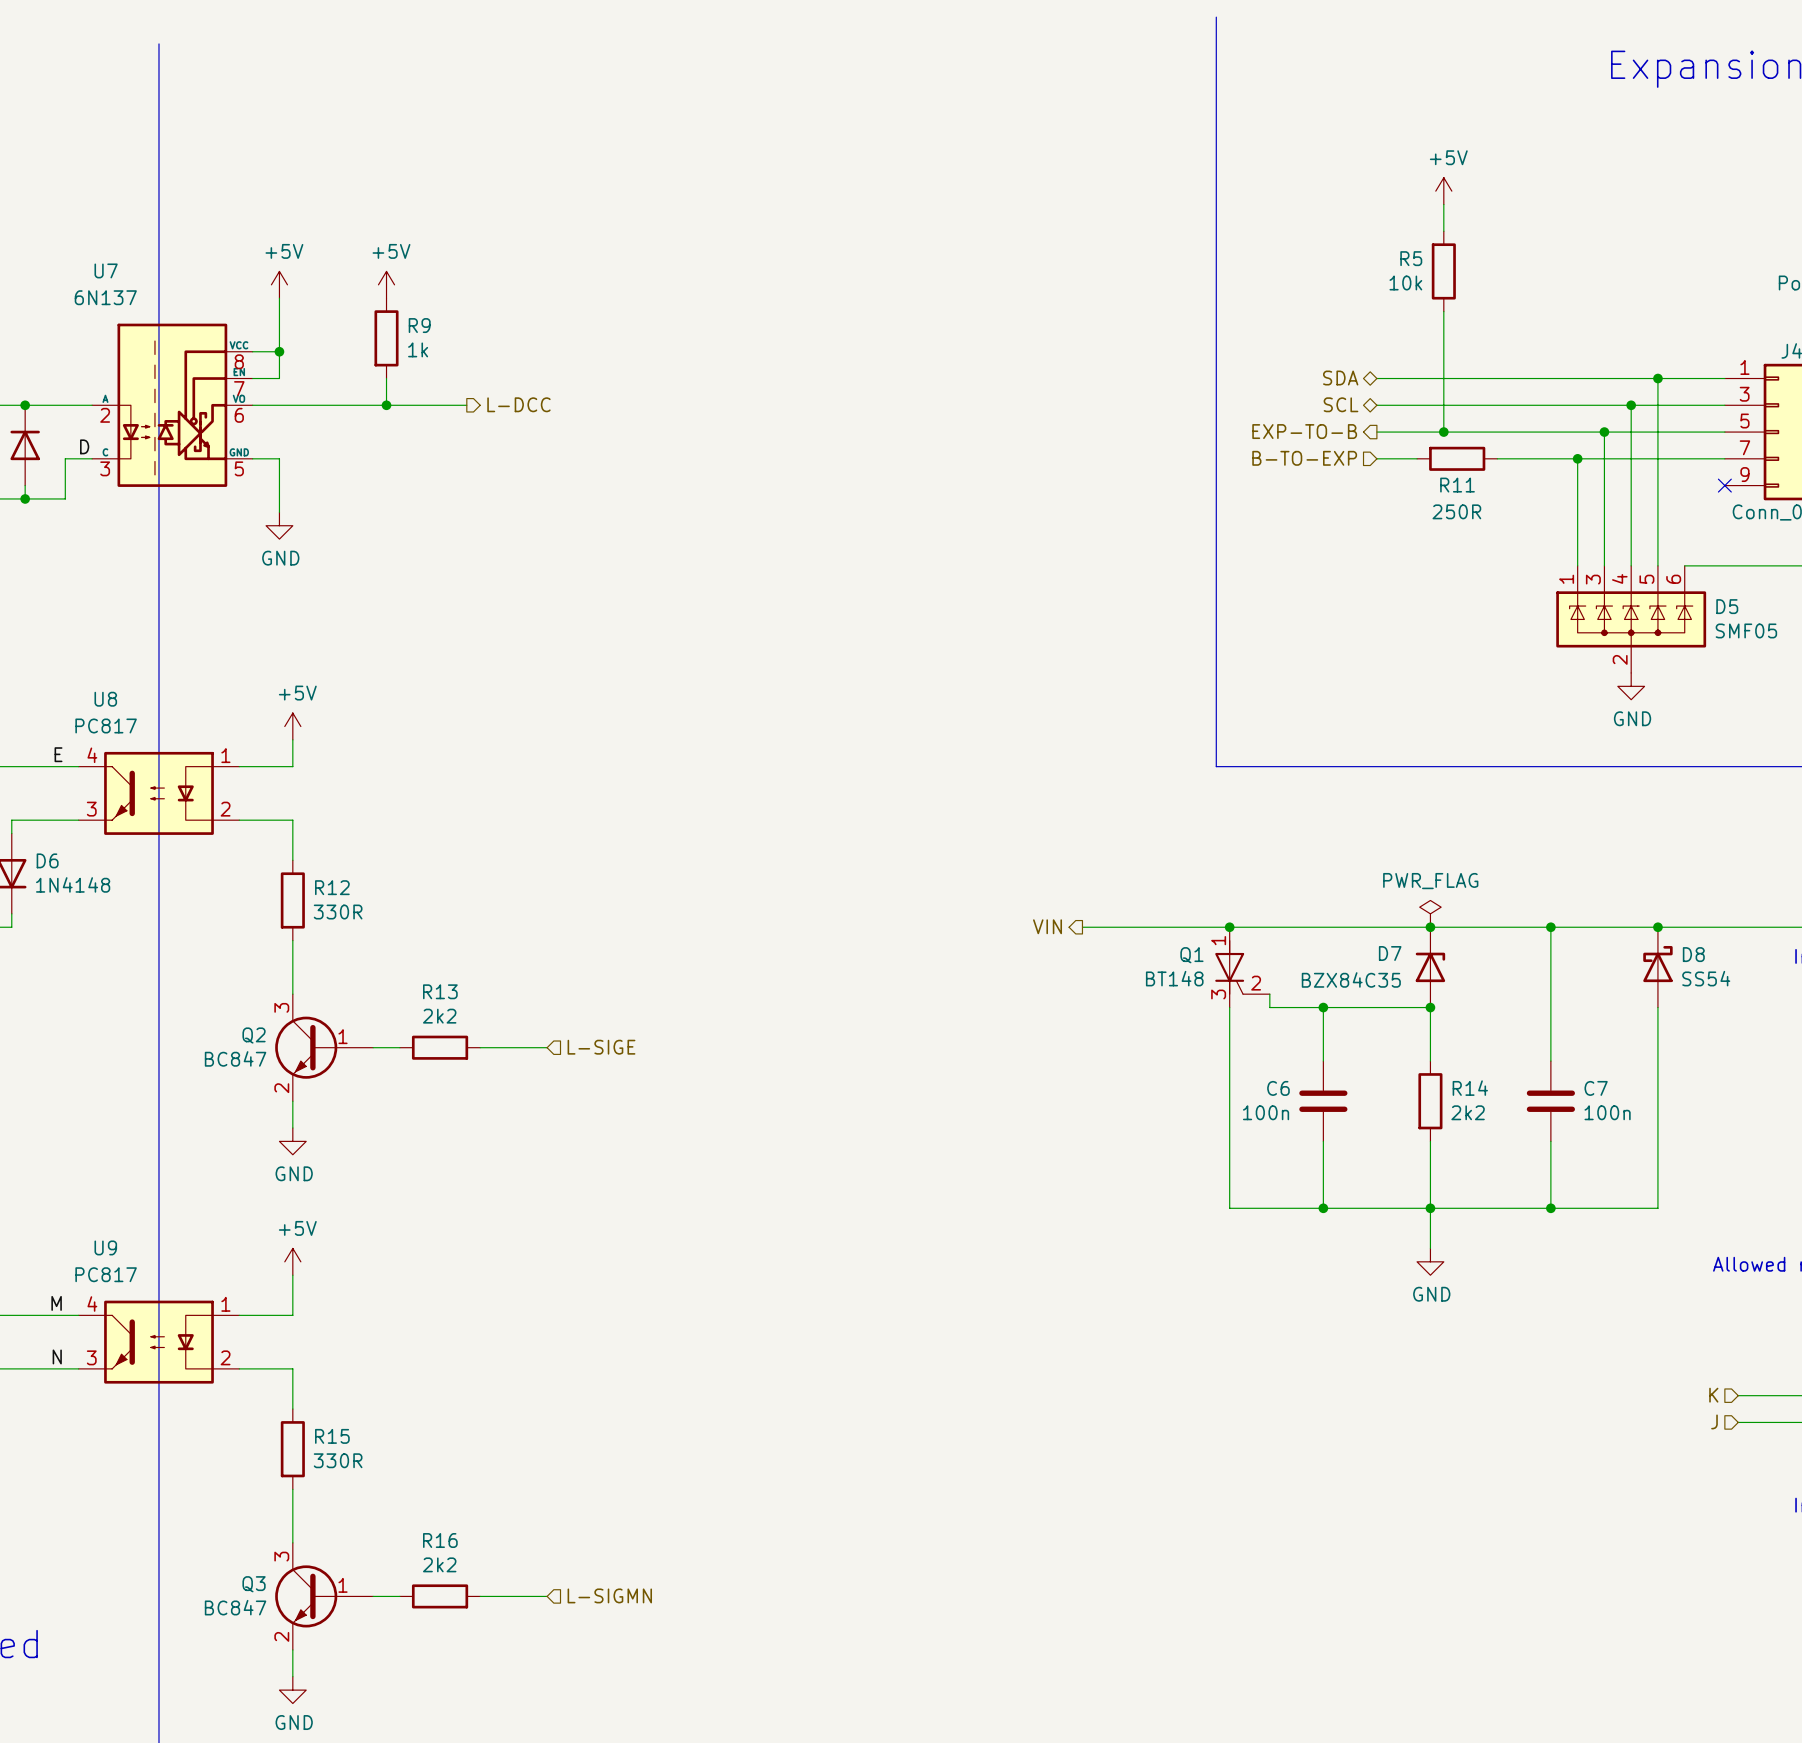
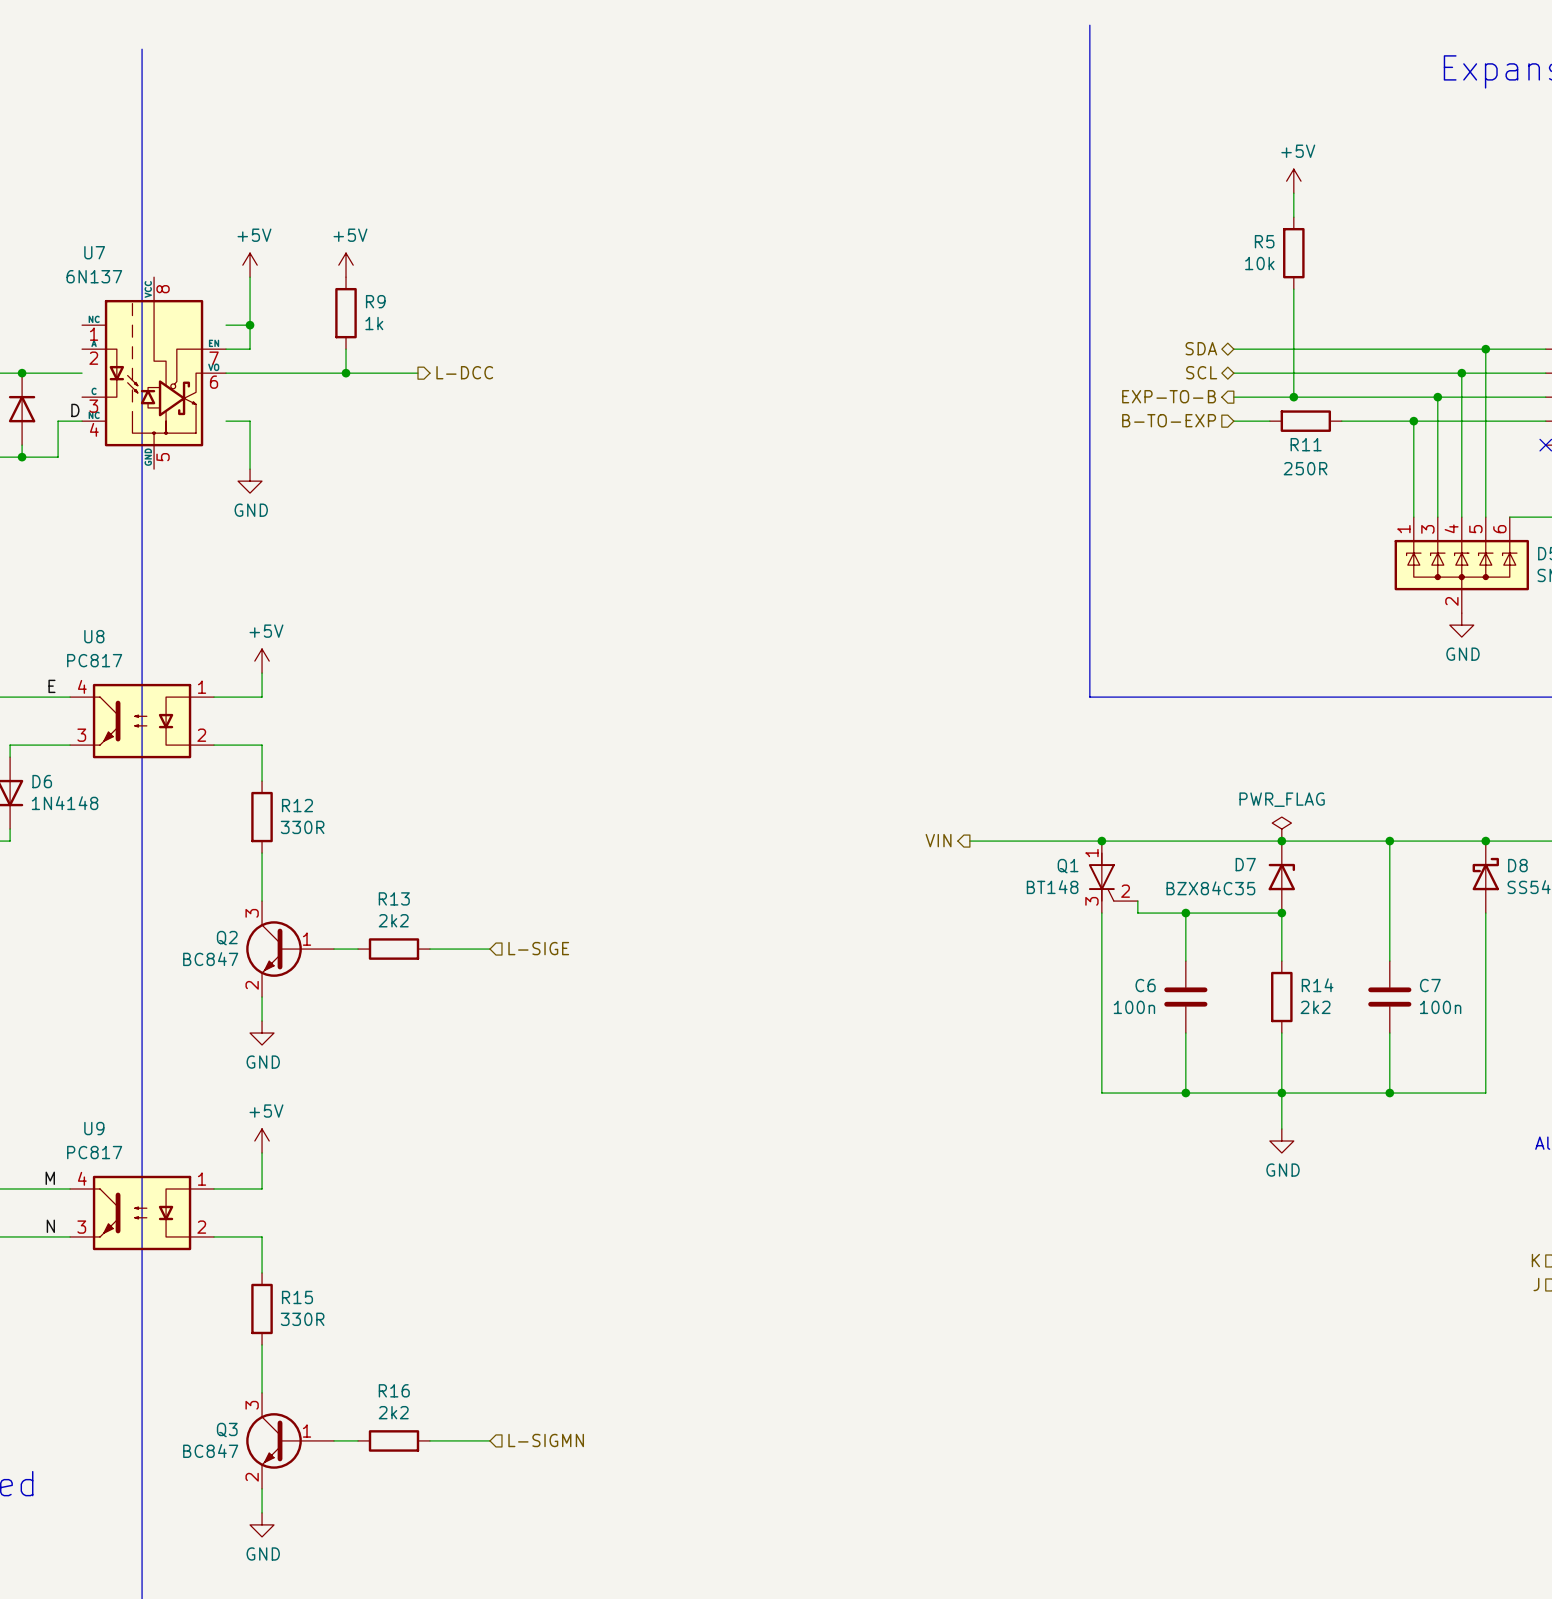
U7 symbol: [92, 323, 253, 487] -> [82, 277, 227, 470]

